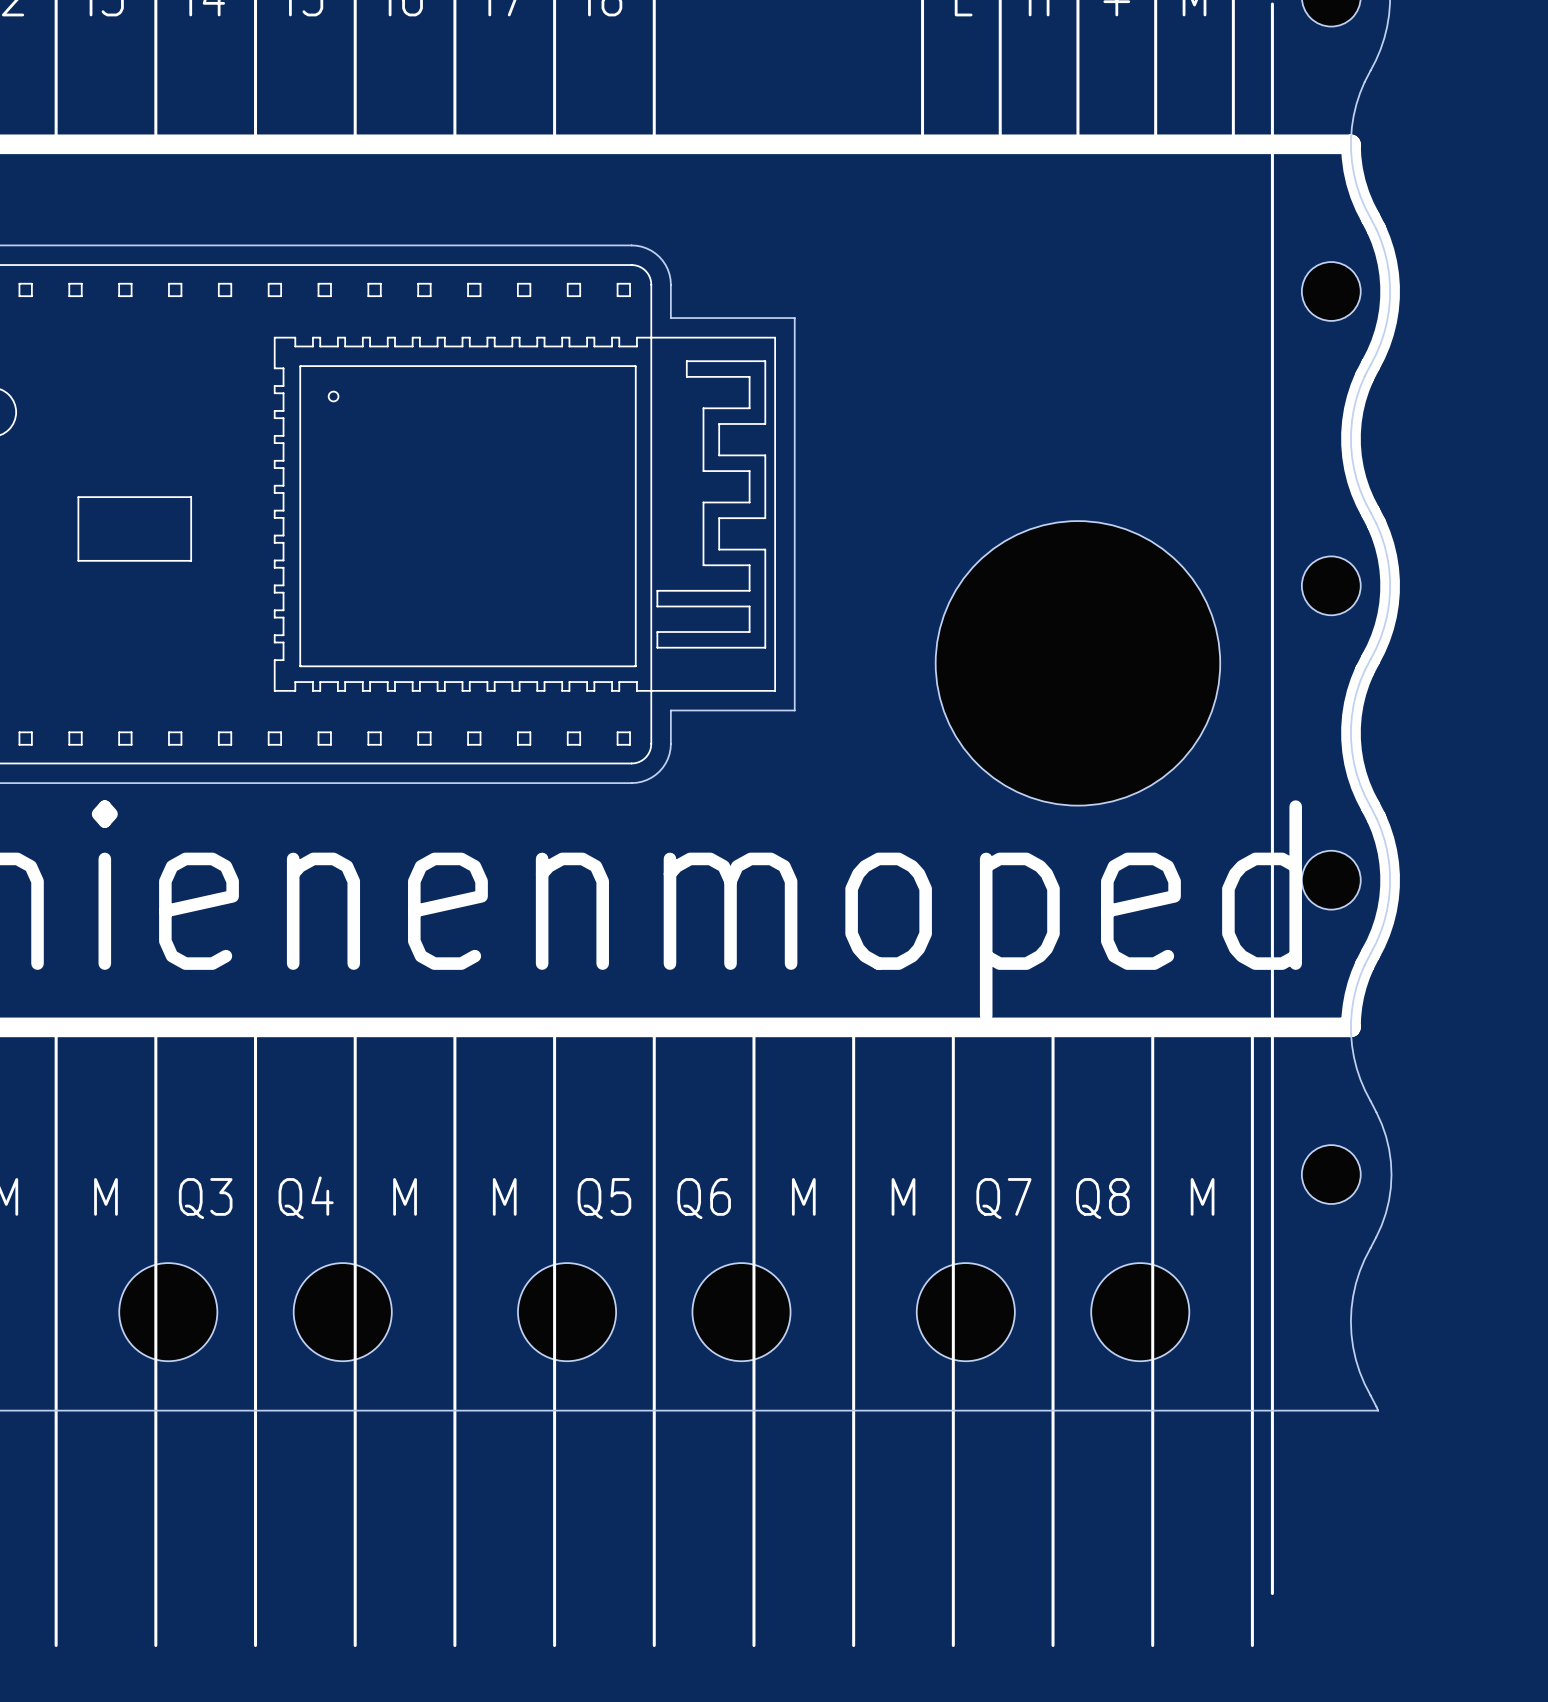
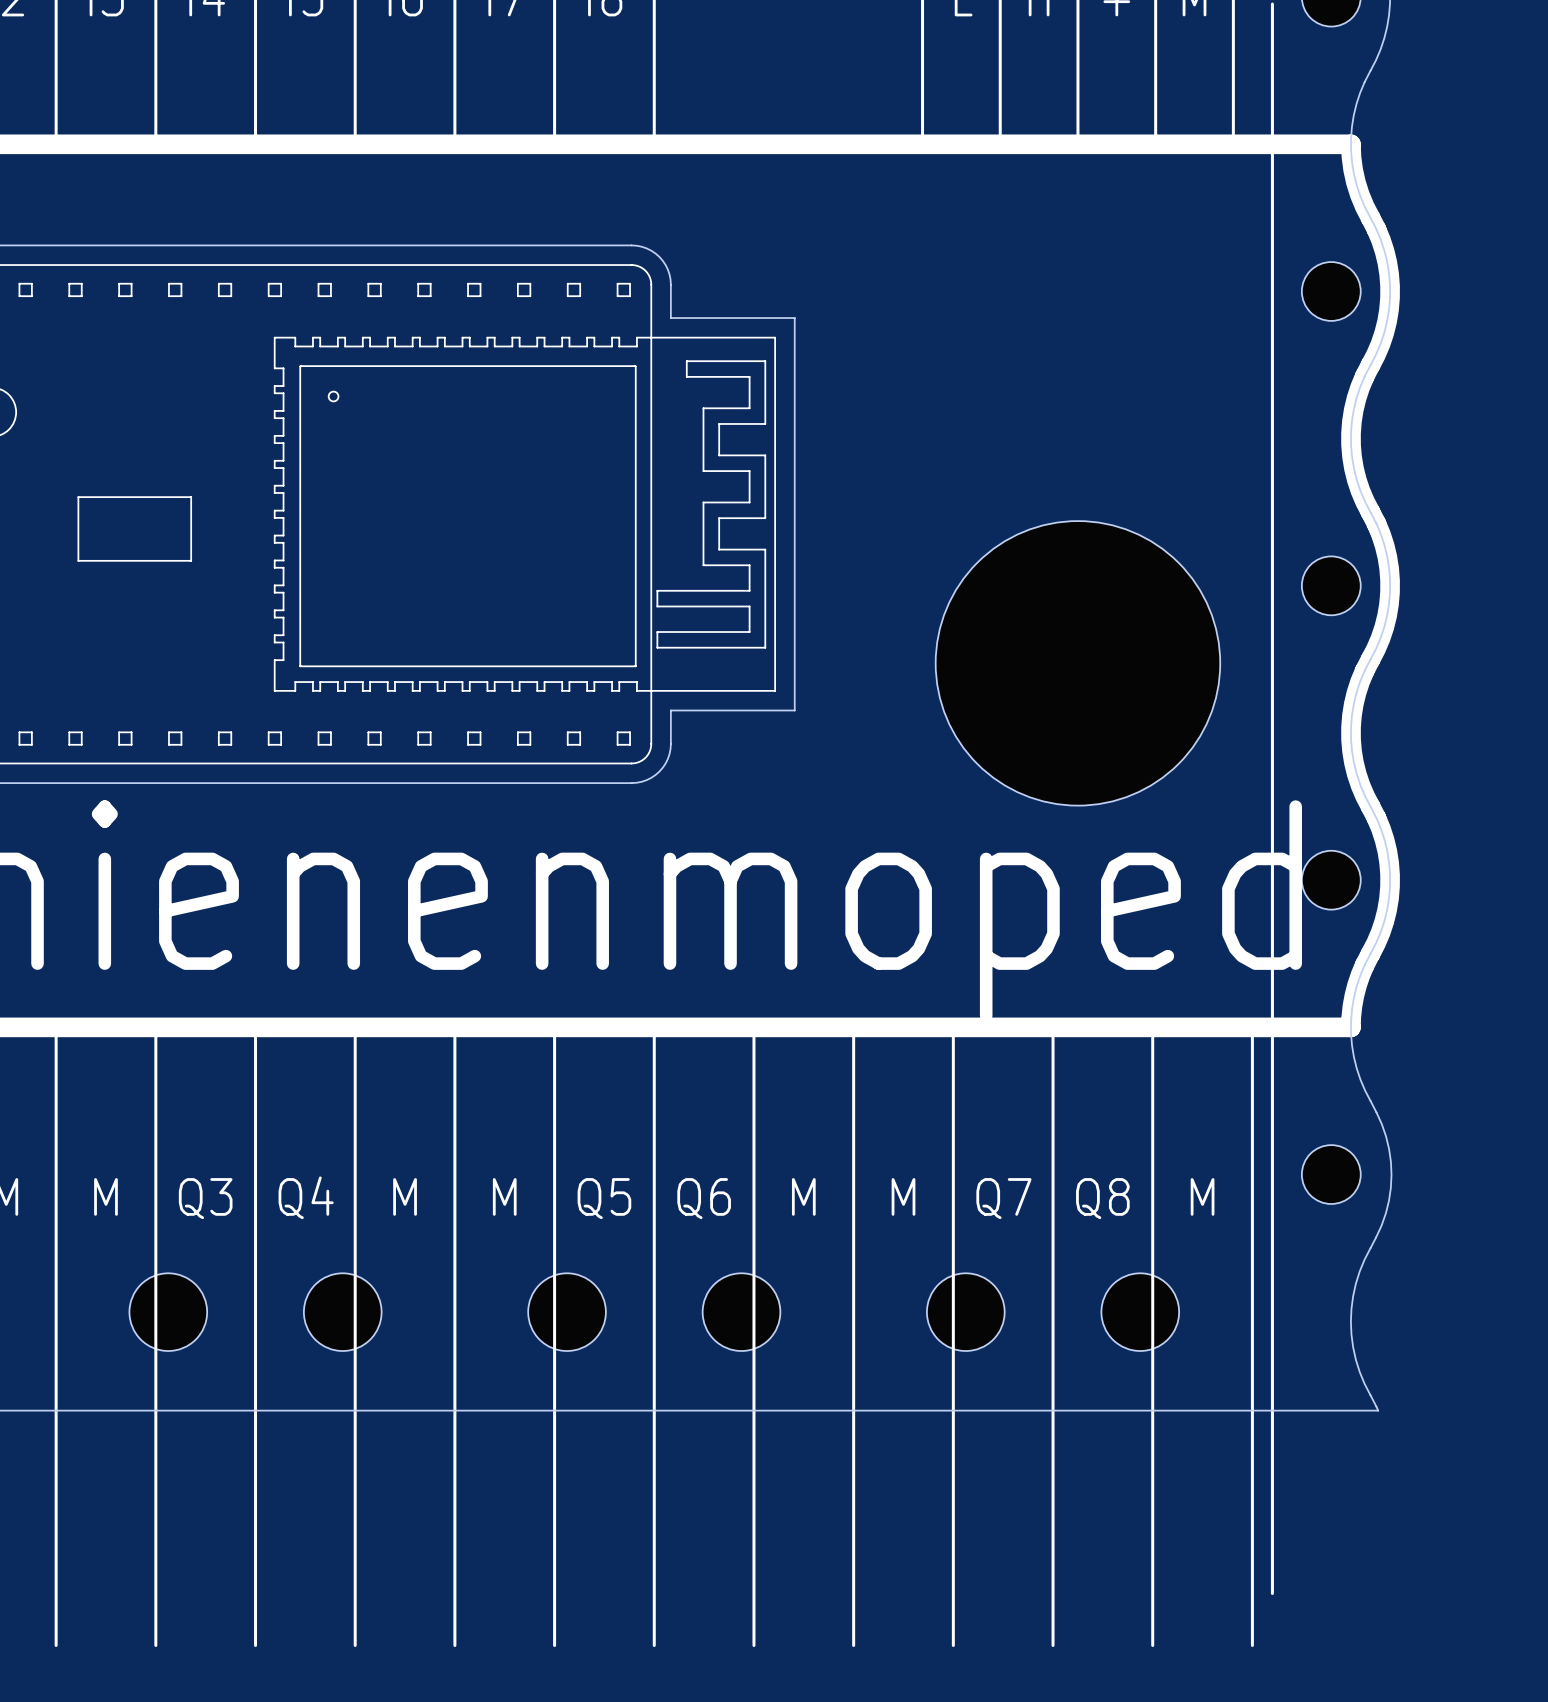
hole size: [119, 1263, 218, 1362] -> [129, 1273, 208, 1352]
hole size: [293, 1263, 392, 1362] -> [303, 1273, 382, 1352]
hole size: [517, 1263, 617, 1362] -> [528, 1273, 606, 1352]
hole size: [692, 1263, 791, 1362] -> [702, 1273, 781, 1352]
hole size: [916, 1263, 1015, 1362] -> [926, 1273, 1005, 1352]
hole size: [1091, 1263, 1190, 1362] -> [1101, 1273, 1180, 1352]

